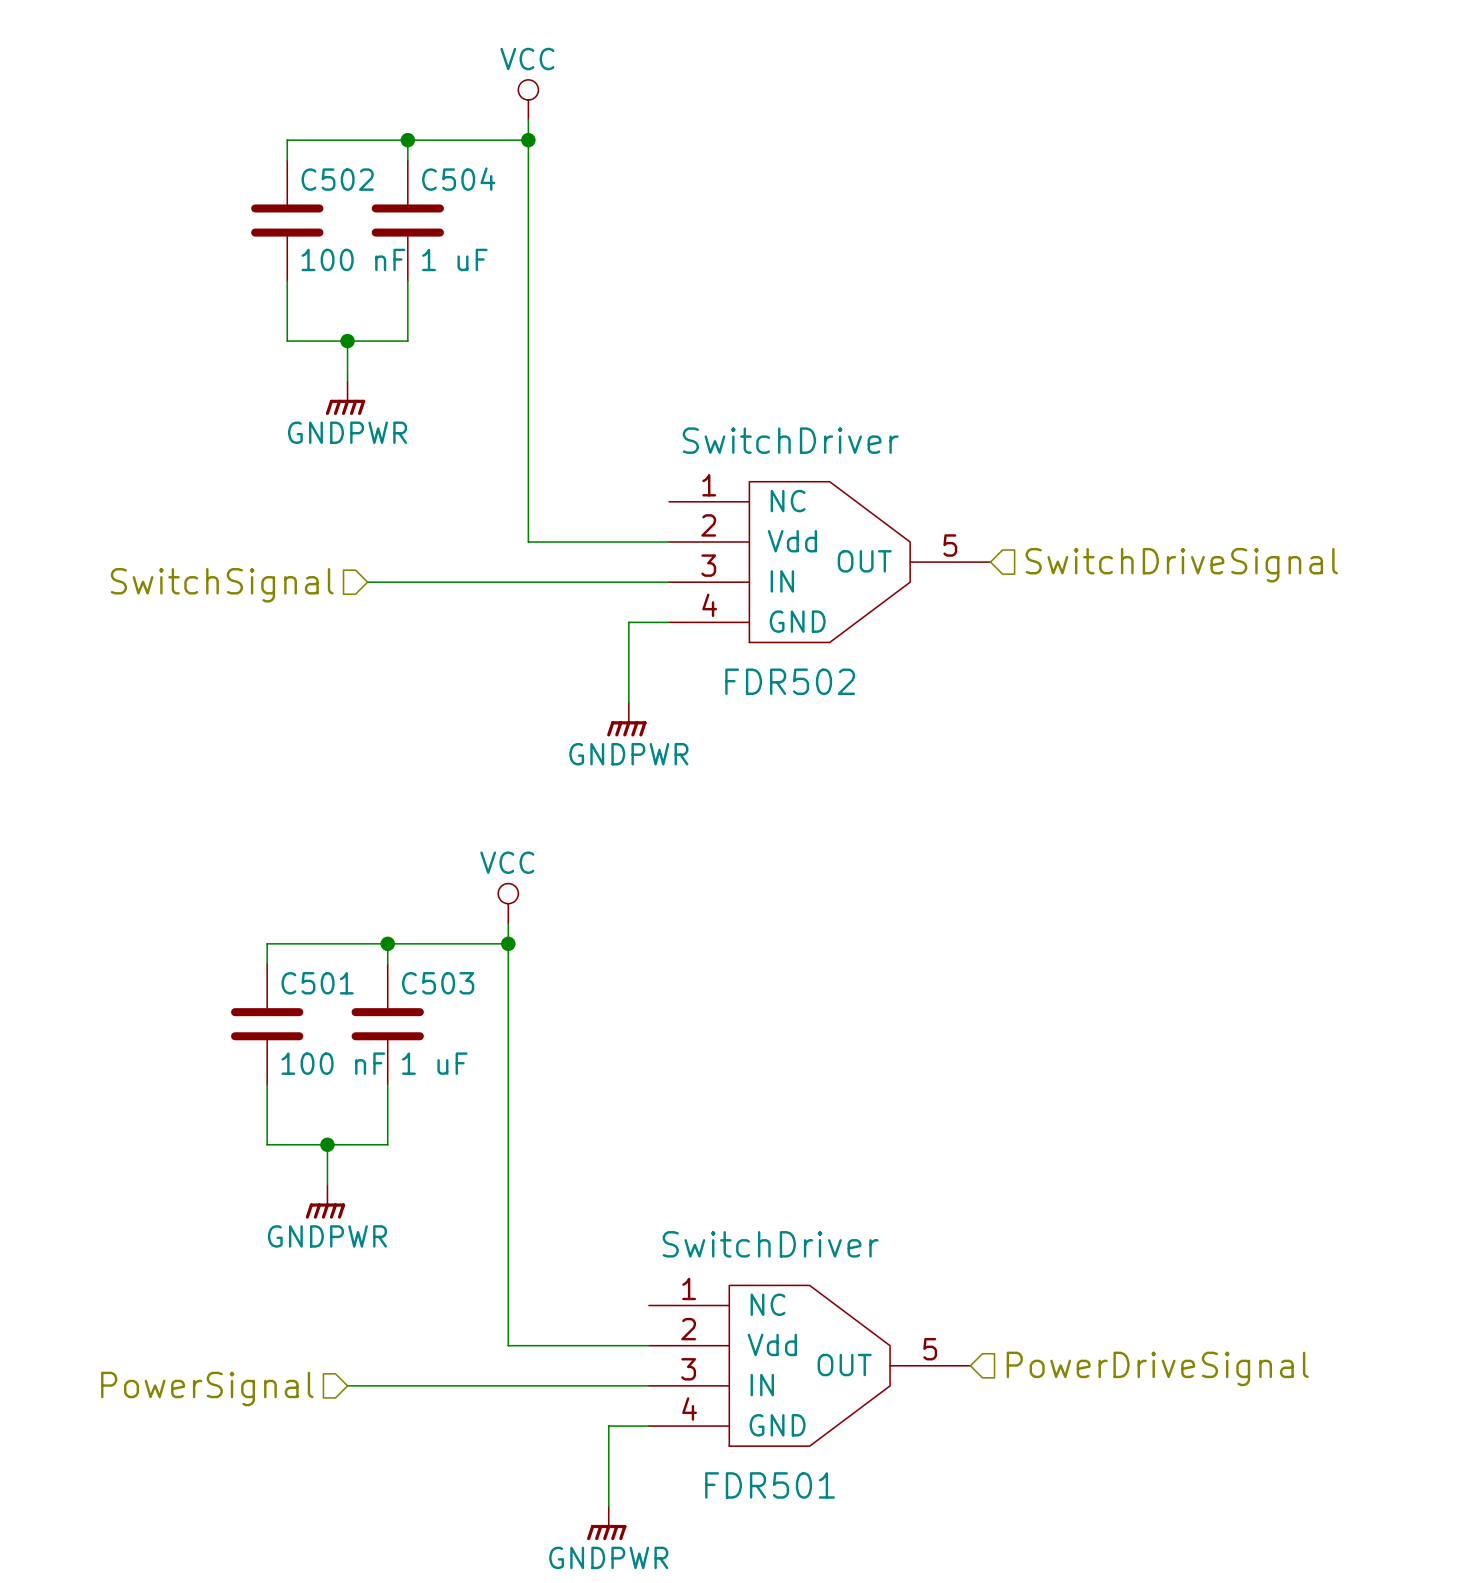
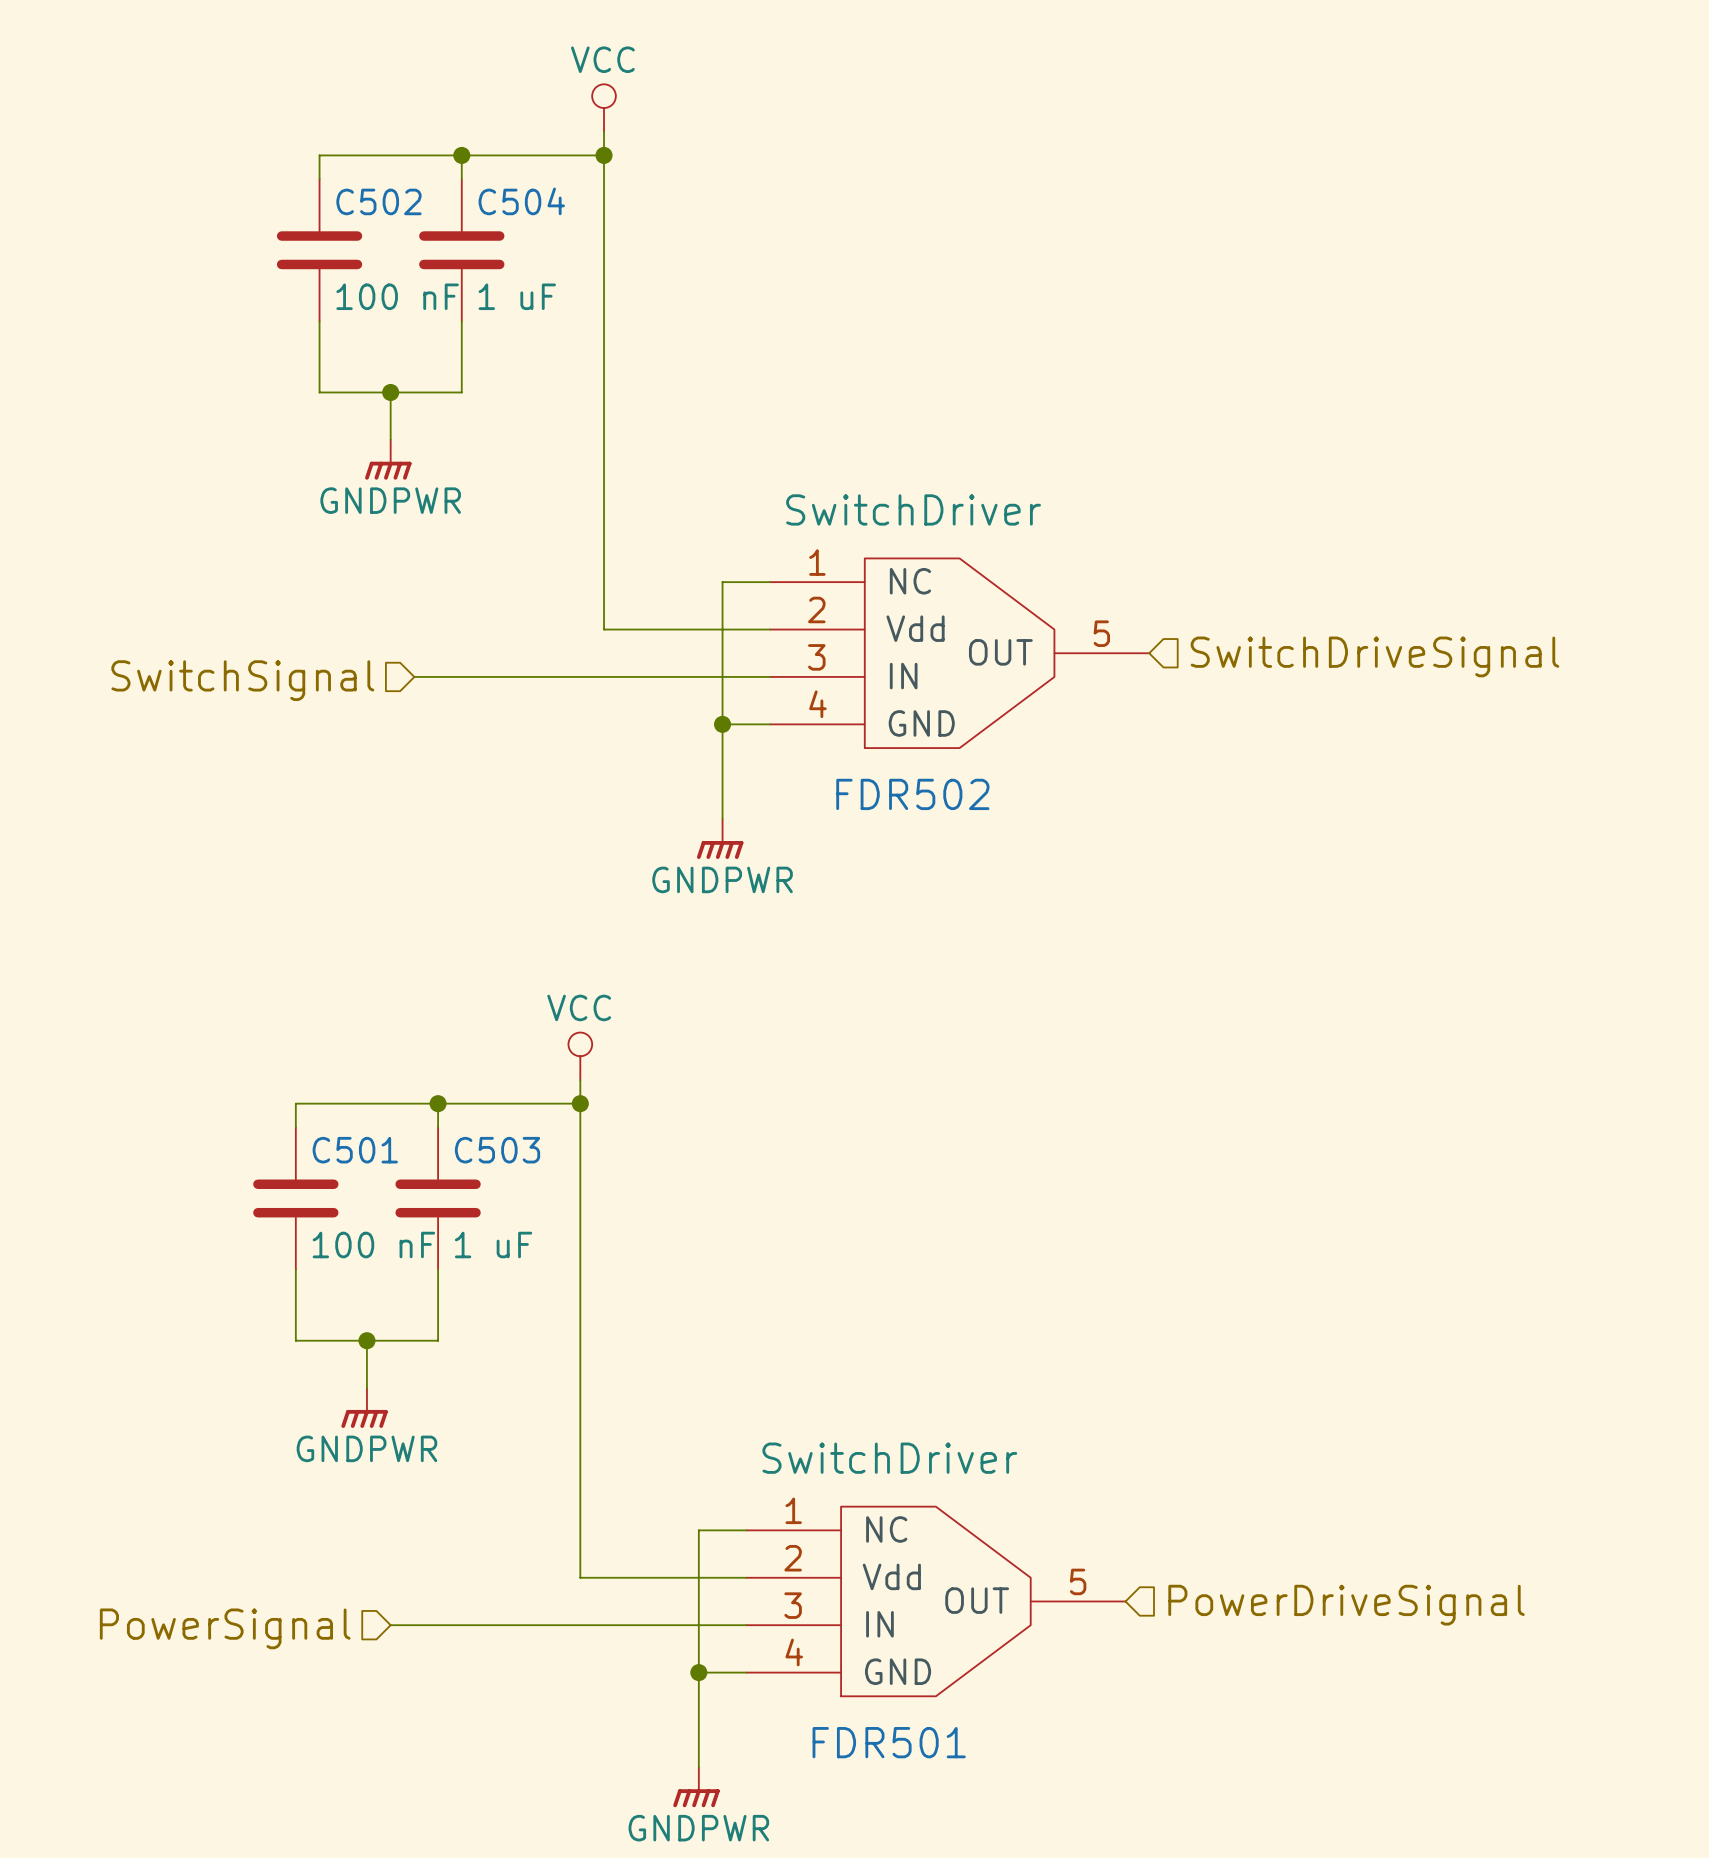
wire: none -> (769, 582) (722, 582) (722, 724)
junction: none -> (722, 724)
wire: none -> (746, 1530) (698, 1530) (698, 1672)
junction: none -> (698, 1672)

